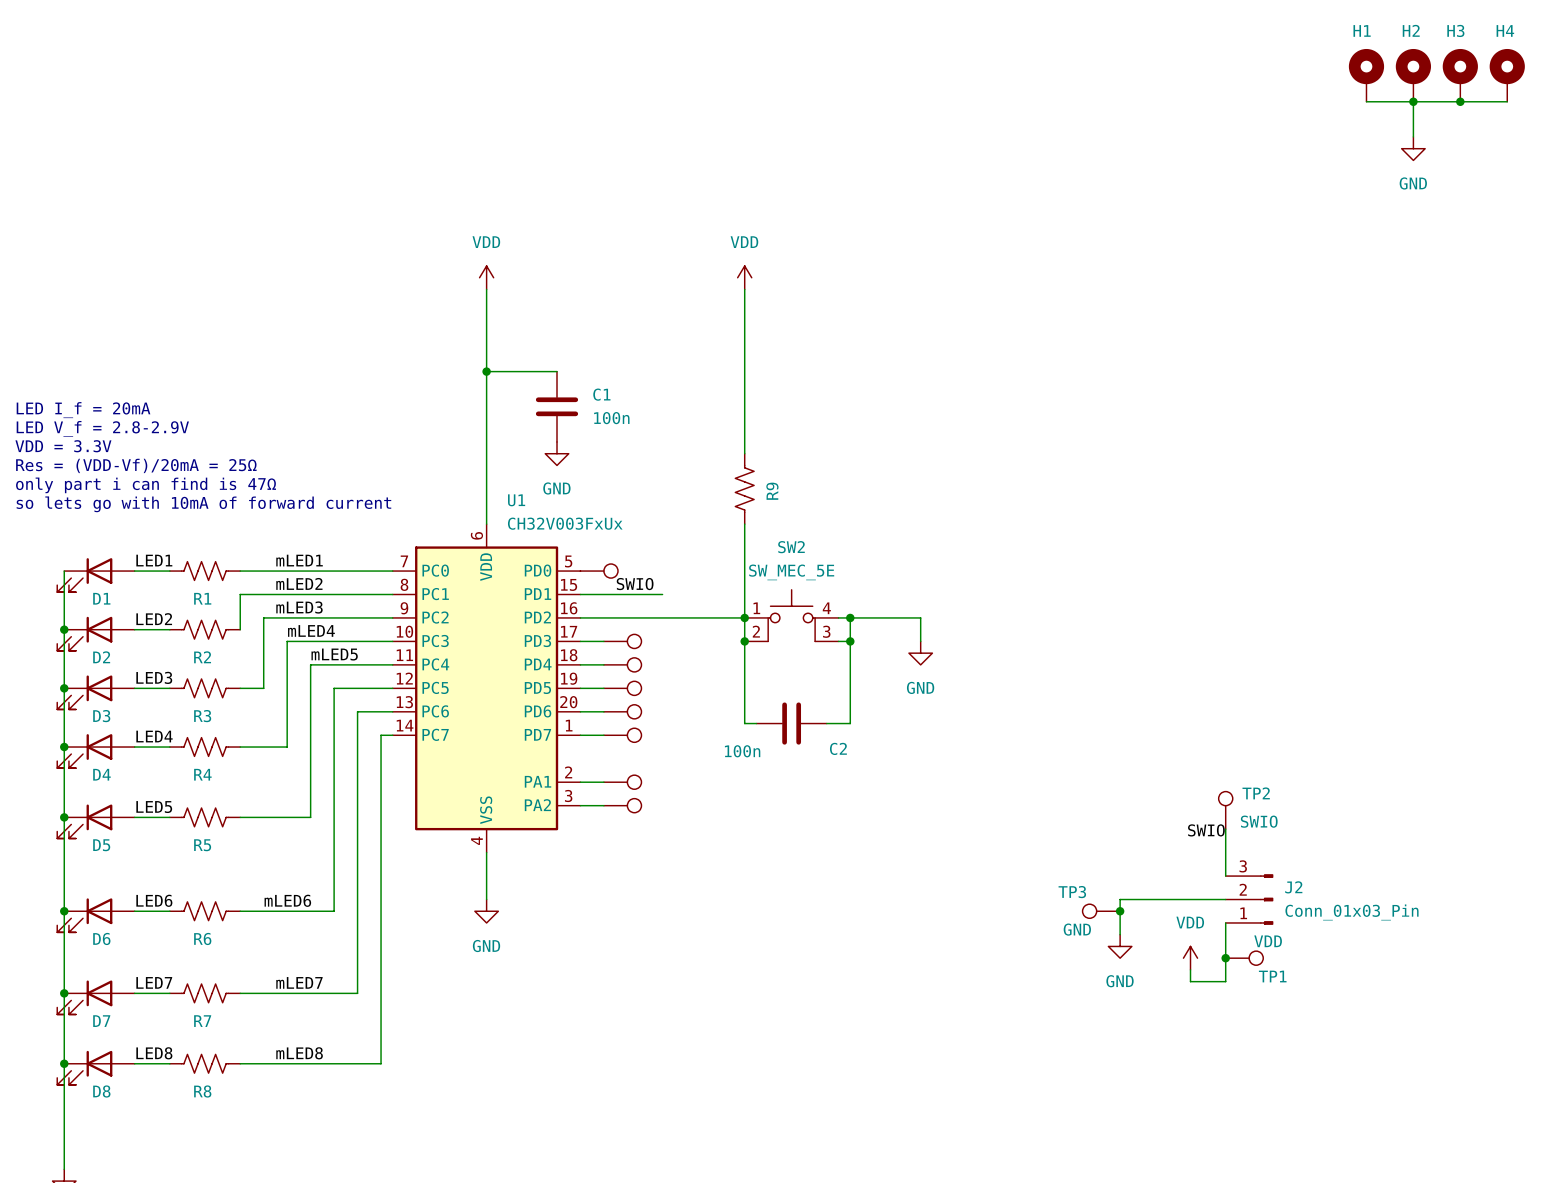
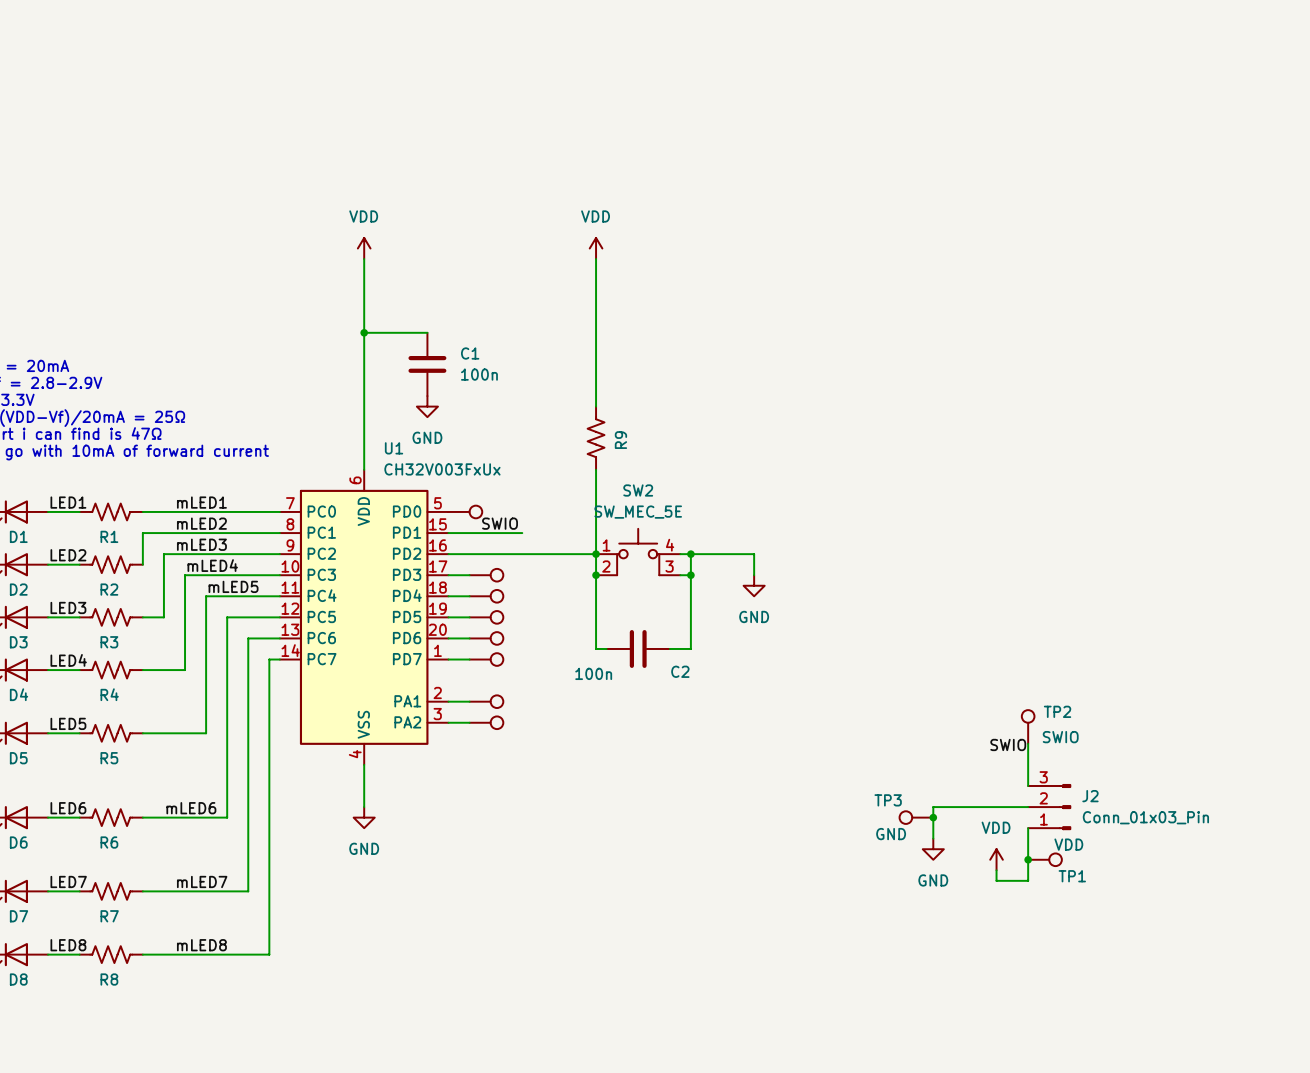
H1: (1366, 75) -> none
H2: (1413, 75) -> none
H3: (1460, 75) -> none
H4: (1507, 75) -> none
wire: (1366, 101) (1507, 101) -> none
wire: (1413, 101) (1413, 136) -> none
junction: (1413, 101) -> none
junction: (1460, 101) -> none
power symbol: GND (1413, 148) -> none

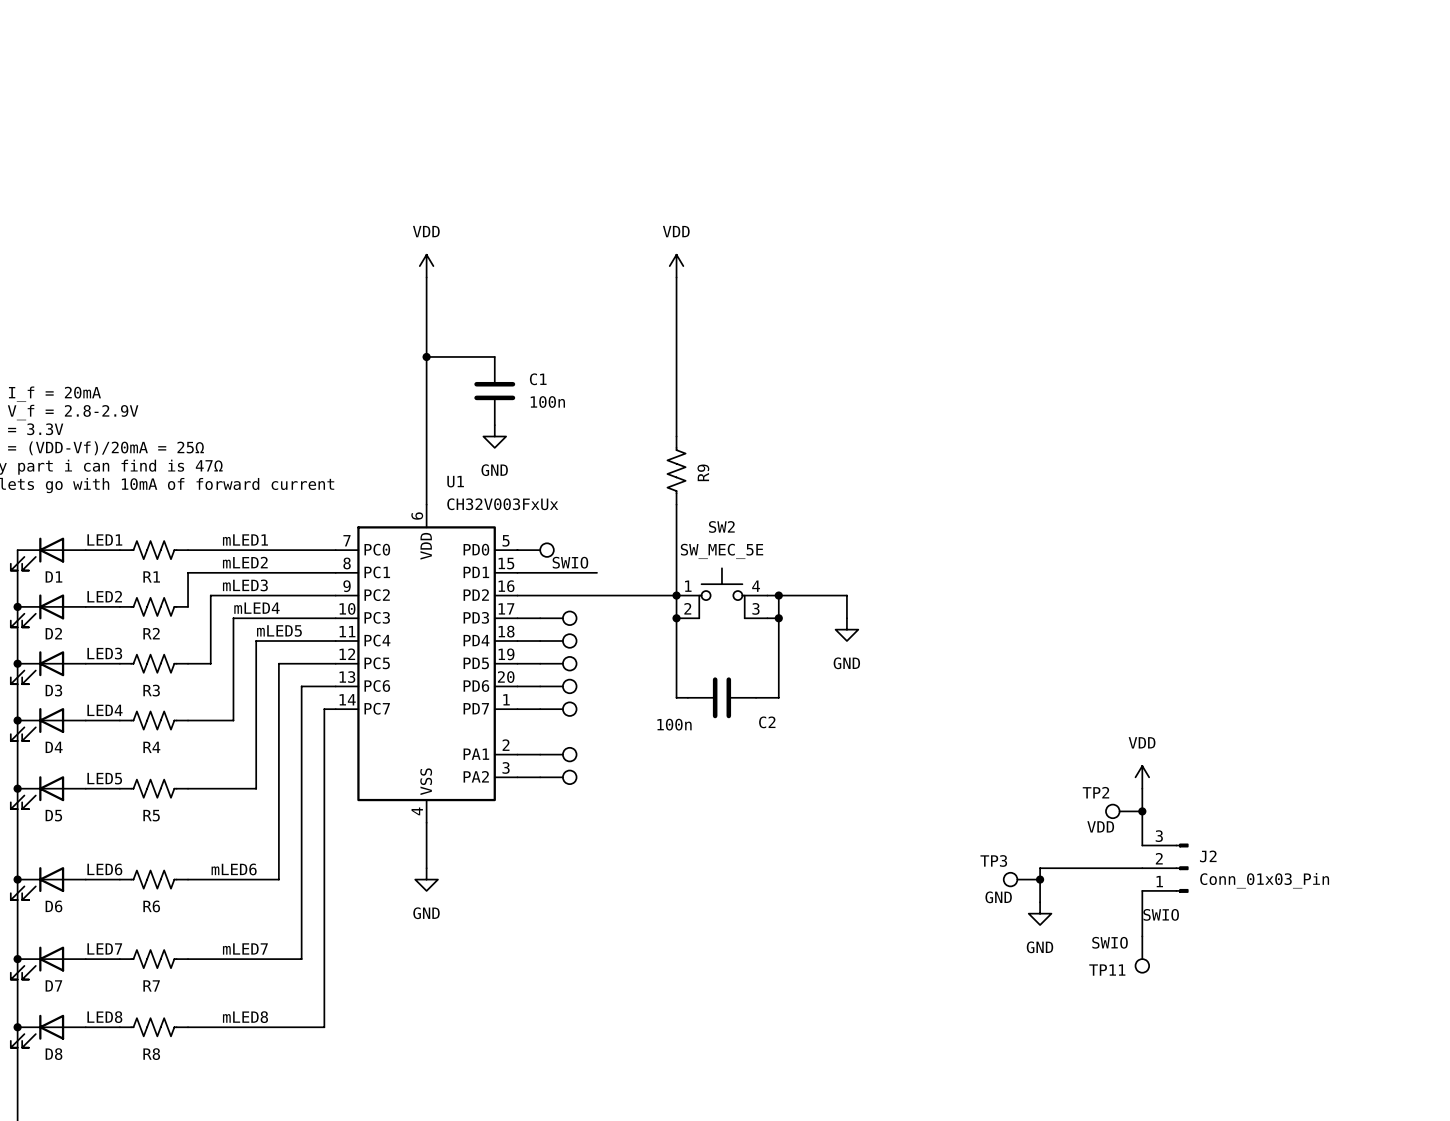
TP2 name position: TP2 (1057, 711) -> TP2 (1095, 792)
TP2 rotation: 0° (1028, 716) -> 90° counterclockwise (1112, 811)
TP2 position: (1028, 726) -> (1124, 811)
TP2 value: SWIO (1060, 737) -> VDD (1100, 826)
label position: SWIO (1008, 744) -> SWIO (1161, 914)
junction: none -> (1142, 811)
power symbol position: VDD (996, 859) -> VDD (1142, 777)
junction: (1028, 859) -> none
TP1: VDD (1045, 859) -> none
wire: (996, 870) (996, 880) (1028, 880) (1028, 870) -> none
TP11: none -> SWIO (1142, 954)

